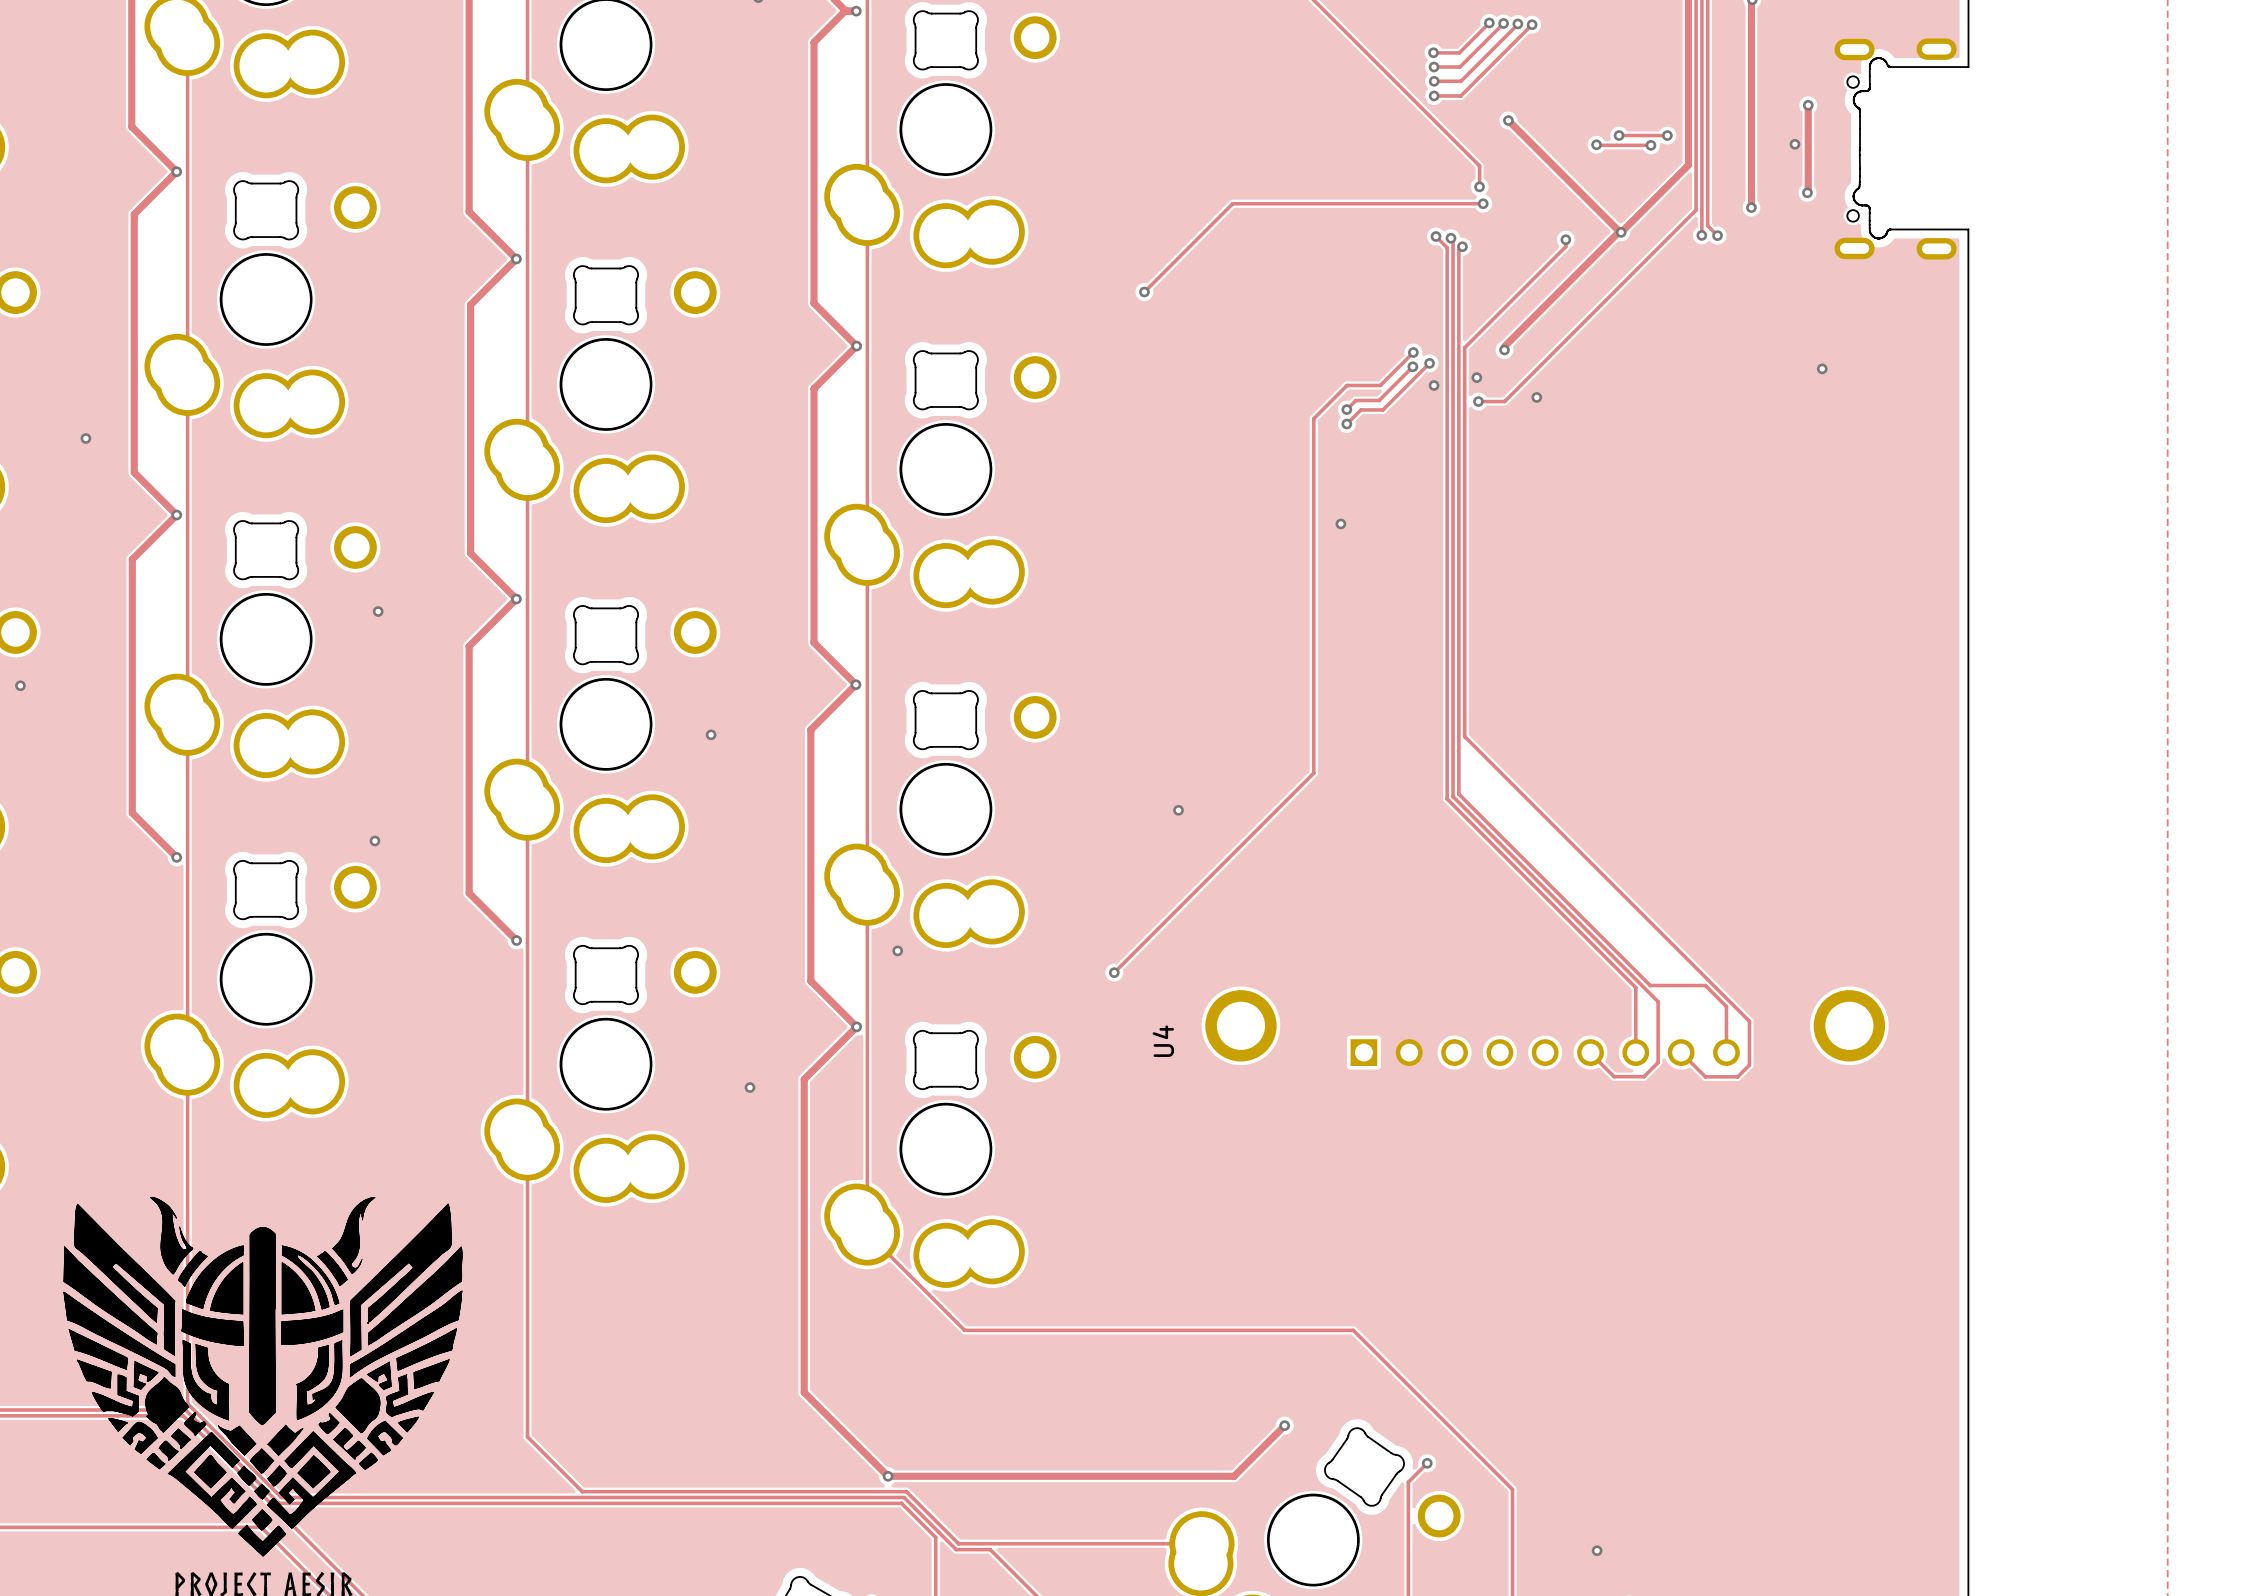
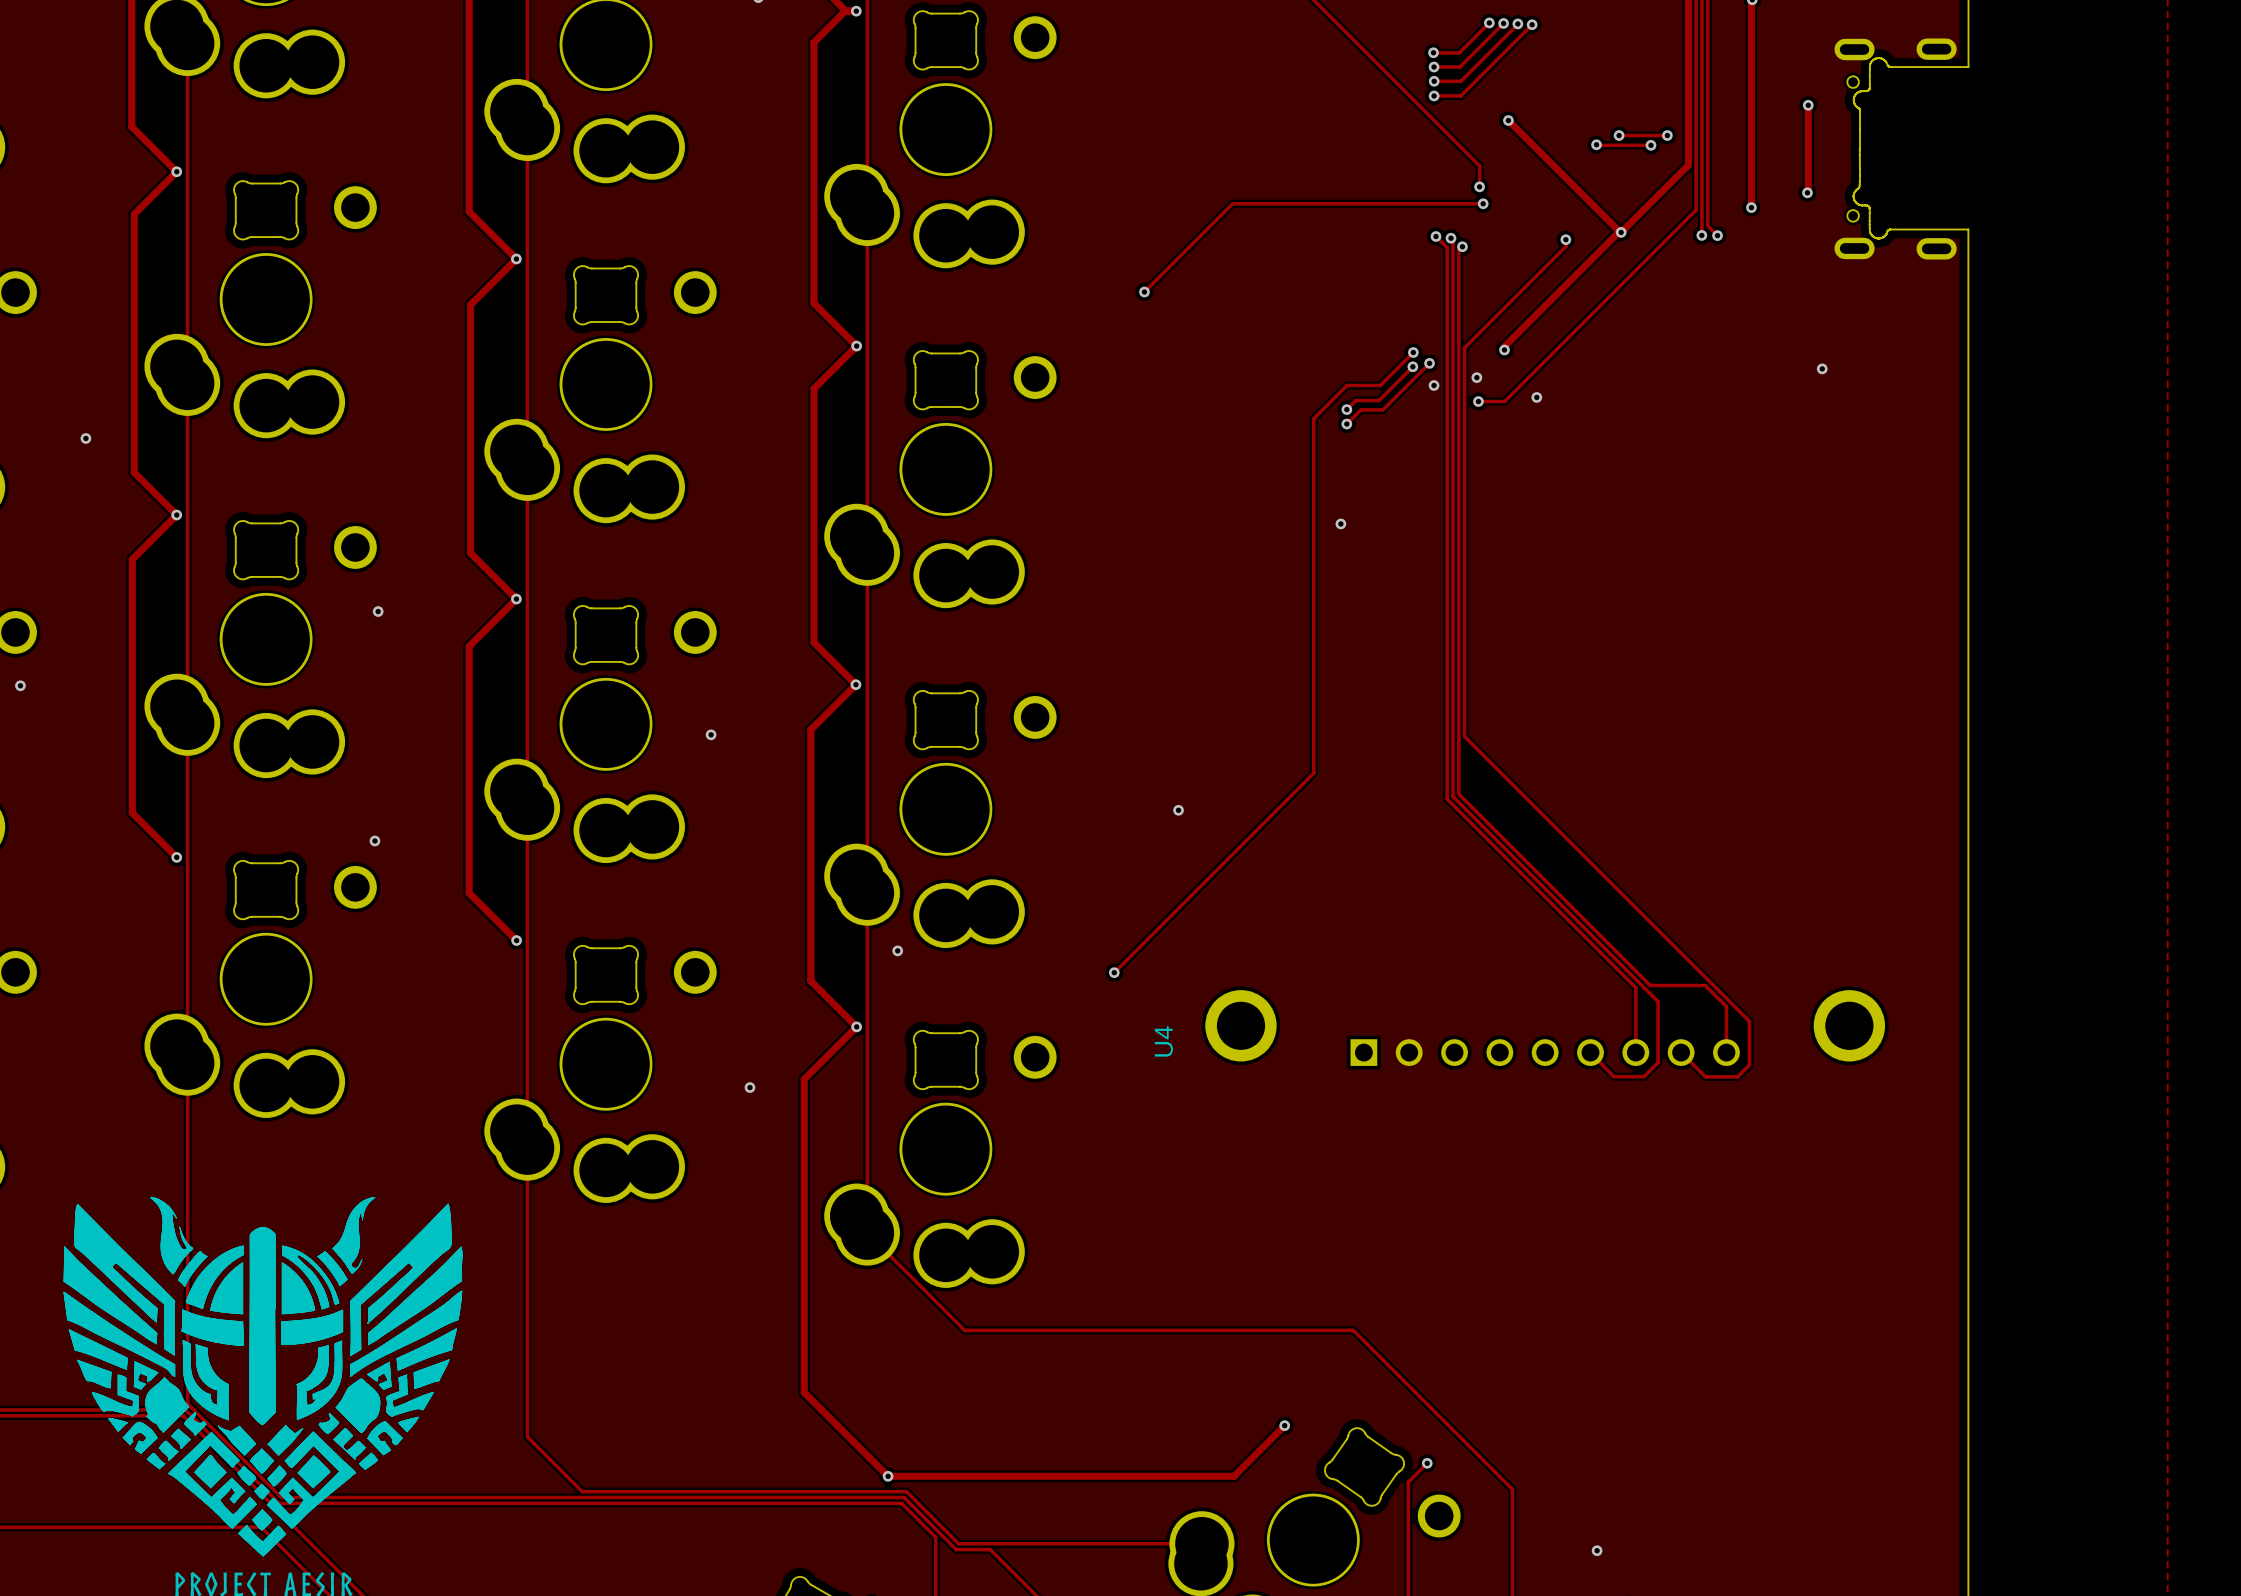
via: (1794, 144) -> none

